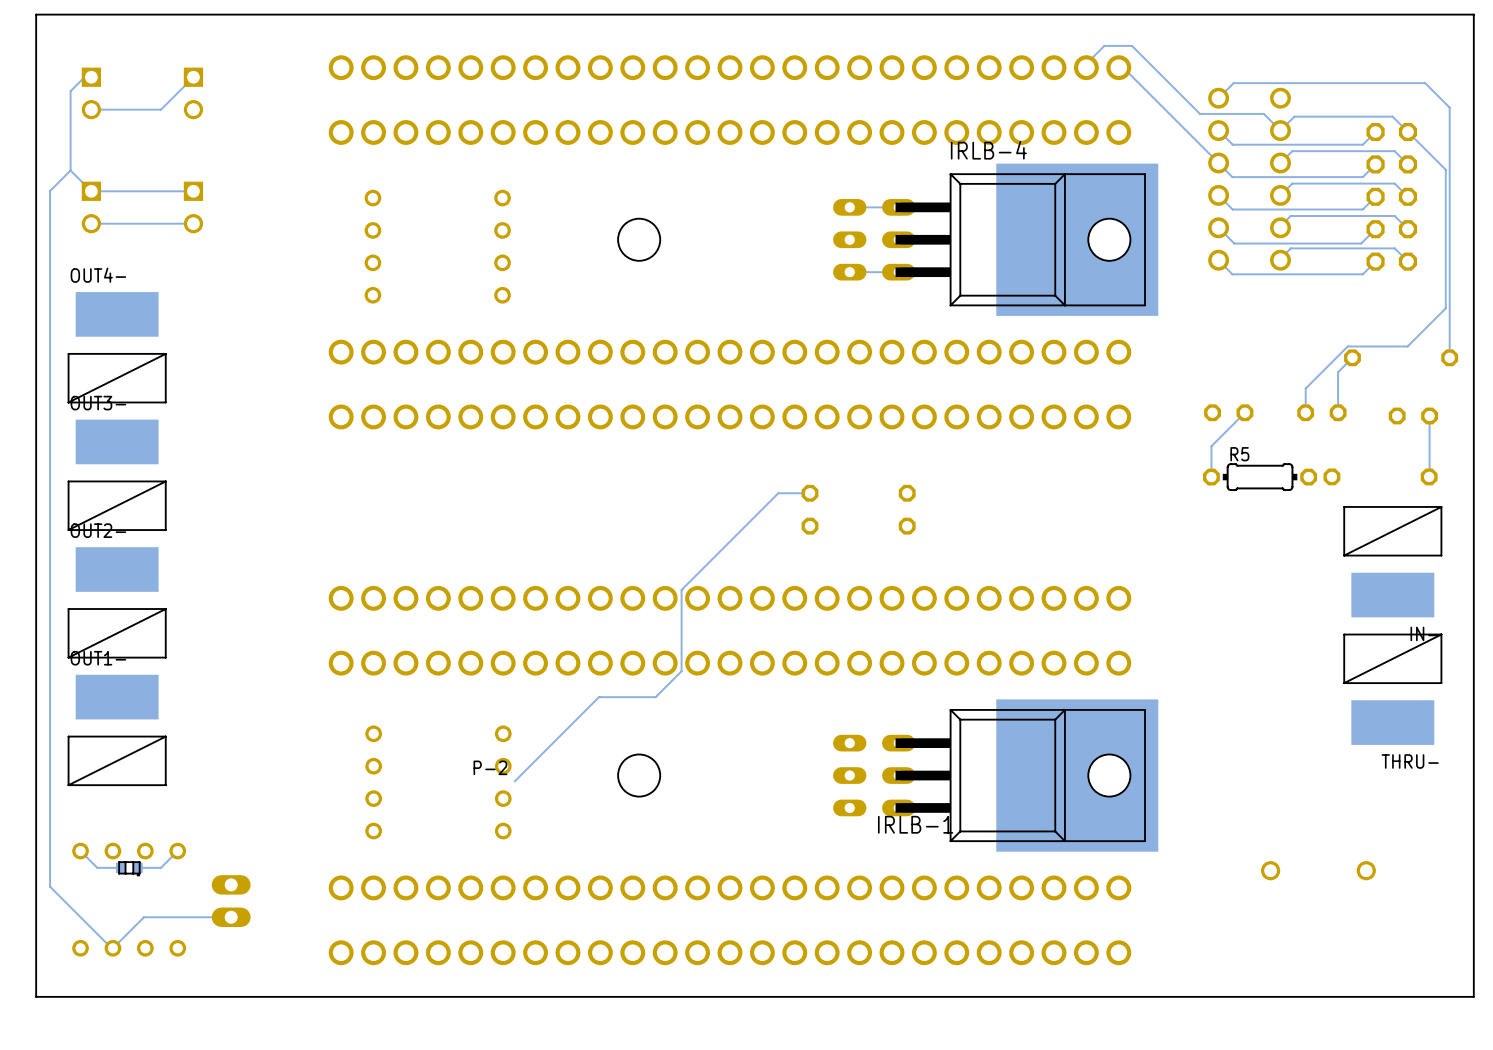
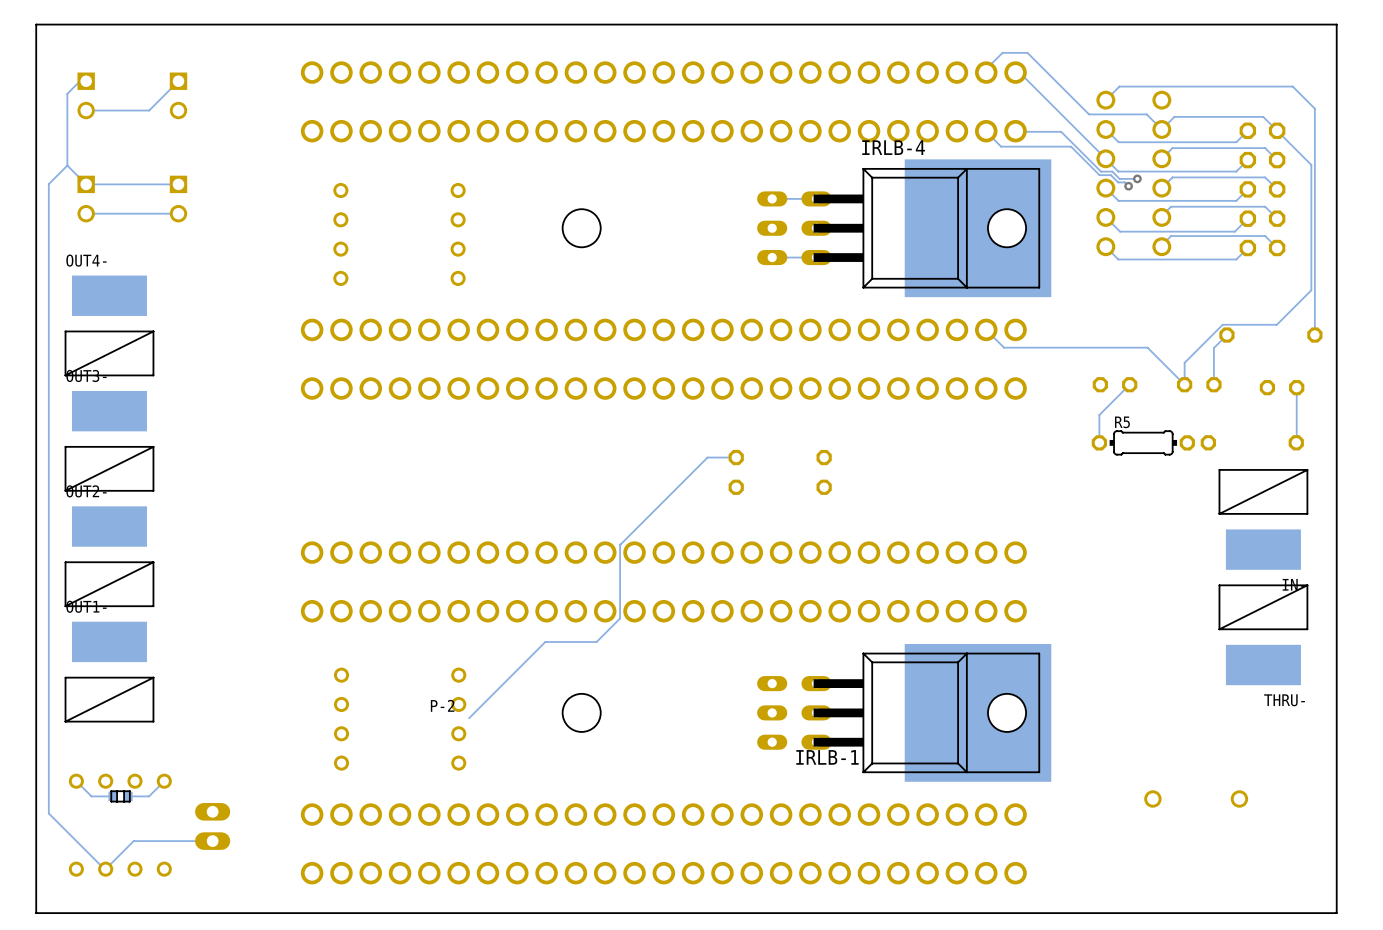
track: none -> (986, 131) (1001, 146) (1071, 146) (1099, 175) (1110, 175) (1118, 182) (1124, 182) (1128, 186)
track: none -> (1015, 131) (1061, 131) (1100, 171) (1112, 171) (1119, 178) (1137, 178)
via: none -> (1137, 178)
via: none -> (1128, 186)
track: none -> (986, 329) (1004, 347) (1147, 347) (1184, 384)

